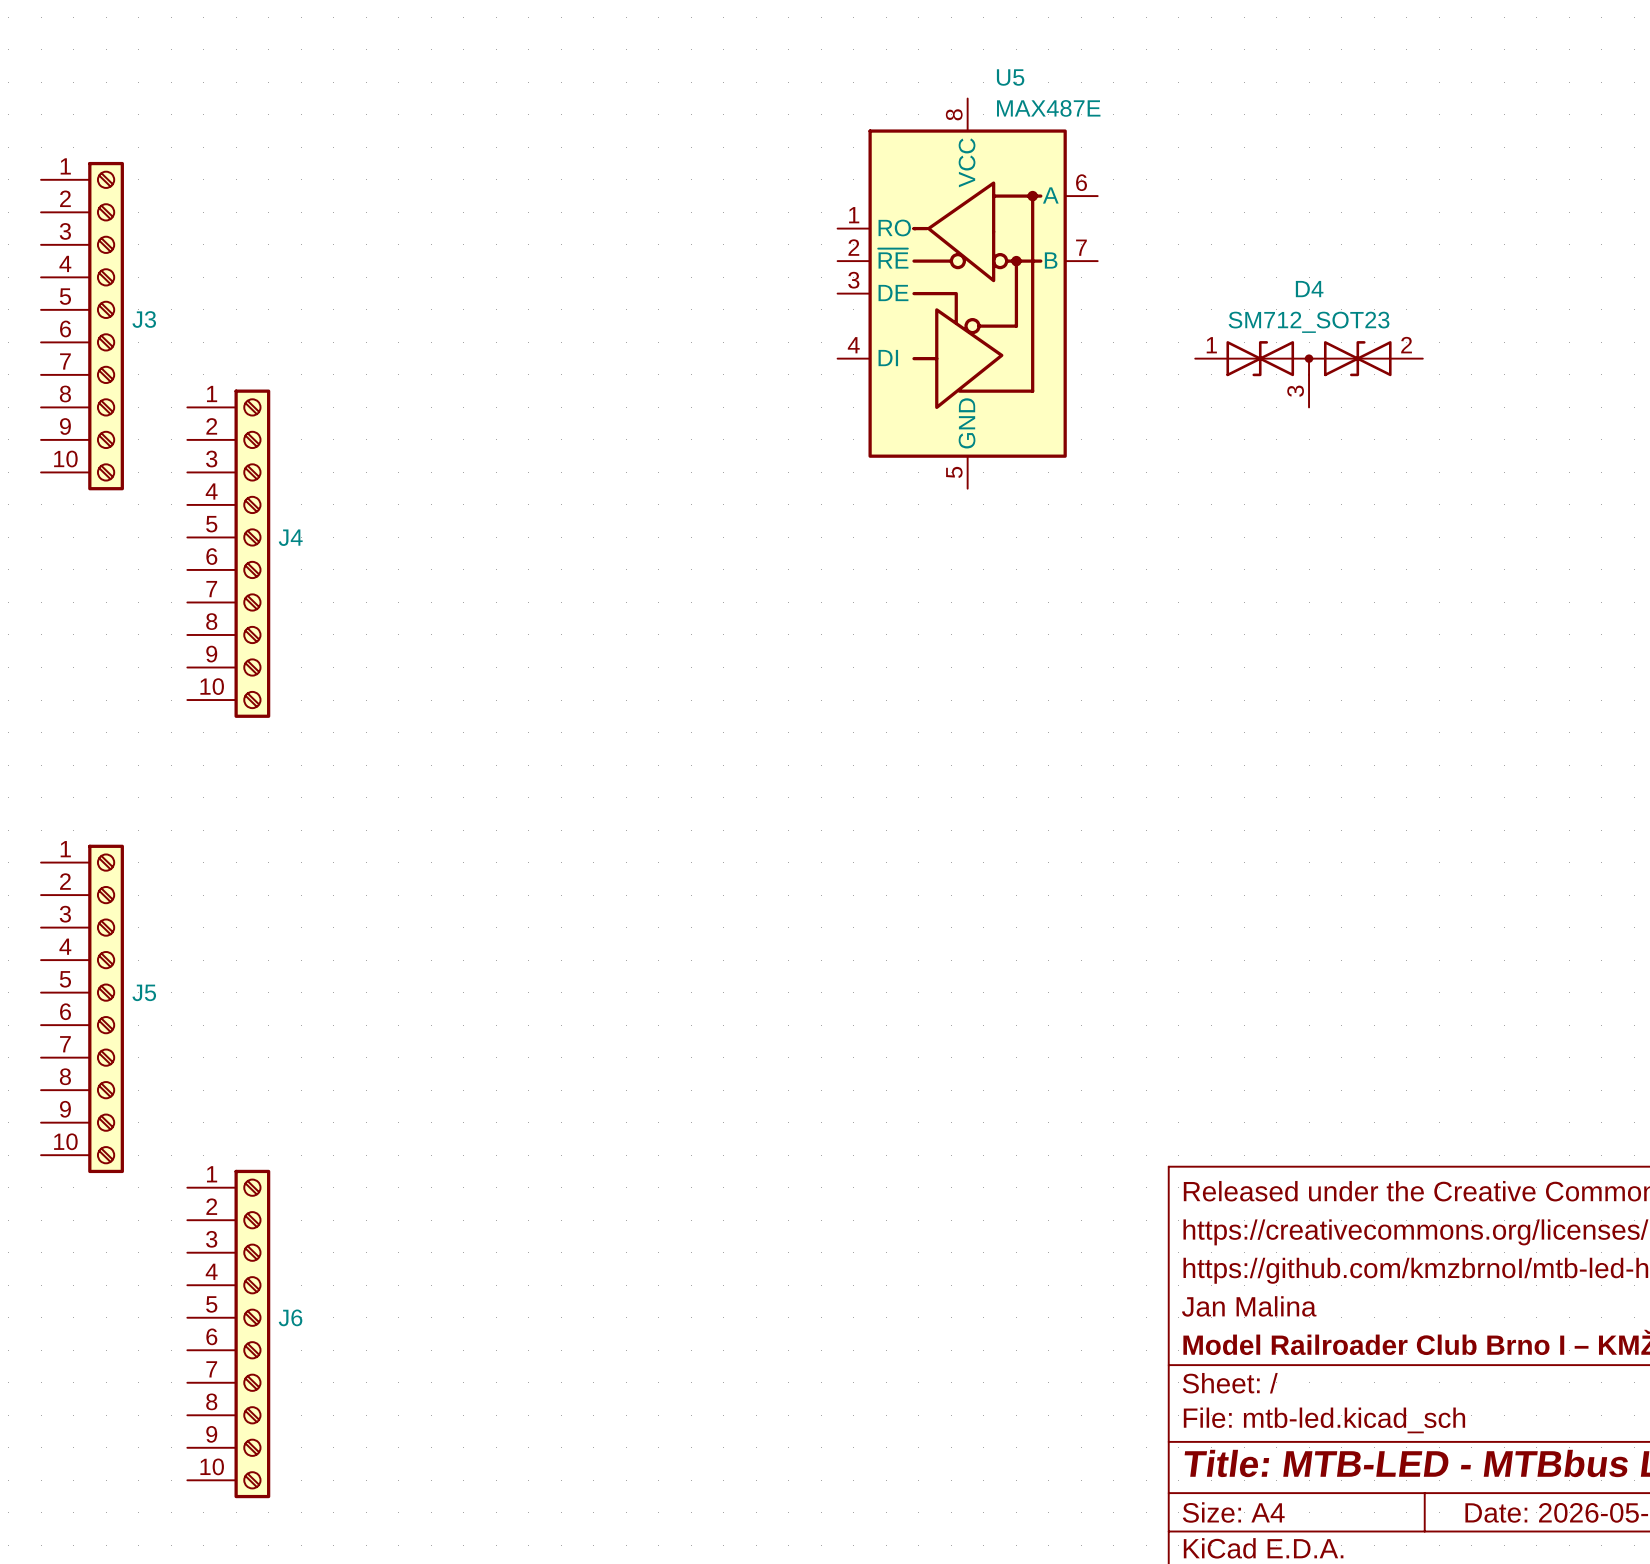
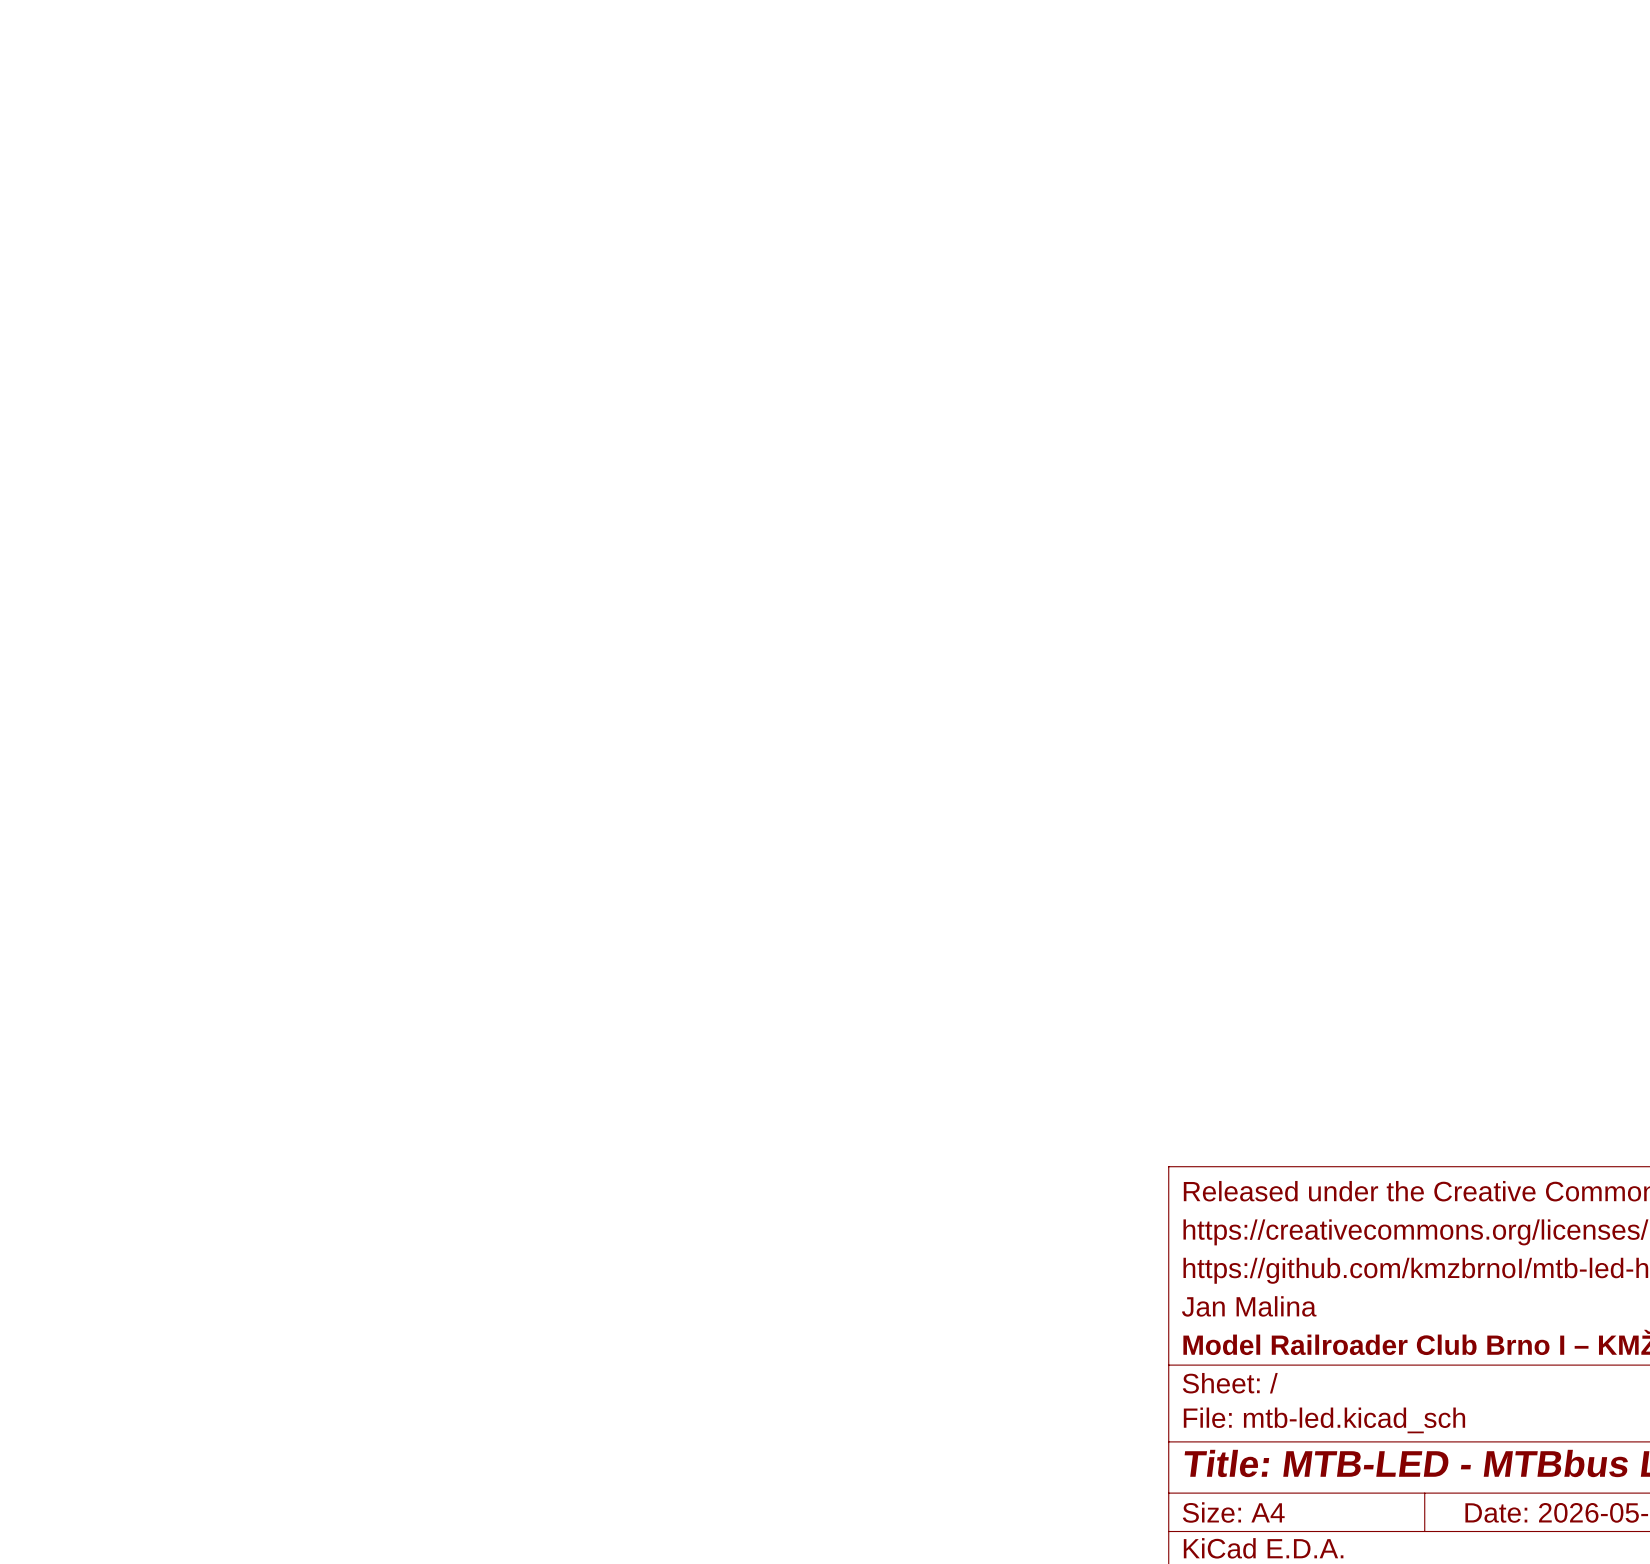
U5: MAX487E (967, 293) -> none
J3: (82, 326) -> none
D4: SM712_SOT23 (1309, 374) -> none
J4: (228, 553) -> none
J5: (82, 1008) -> none
J6: (228, 1334) -> none

